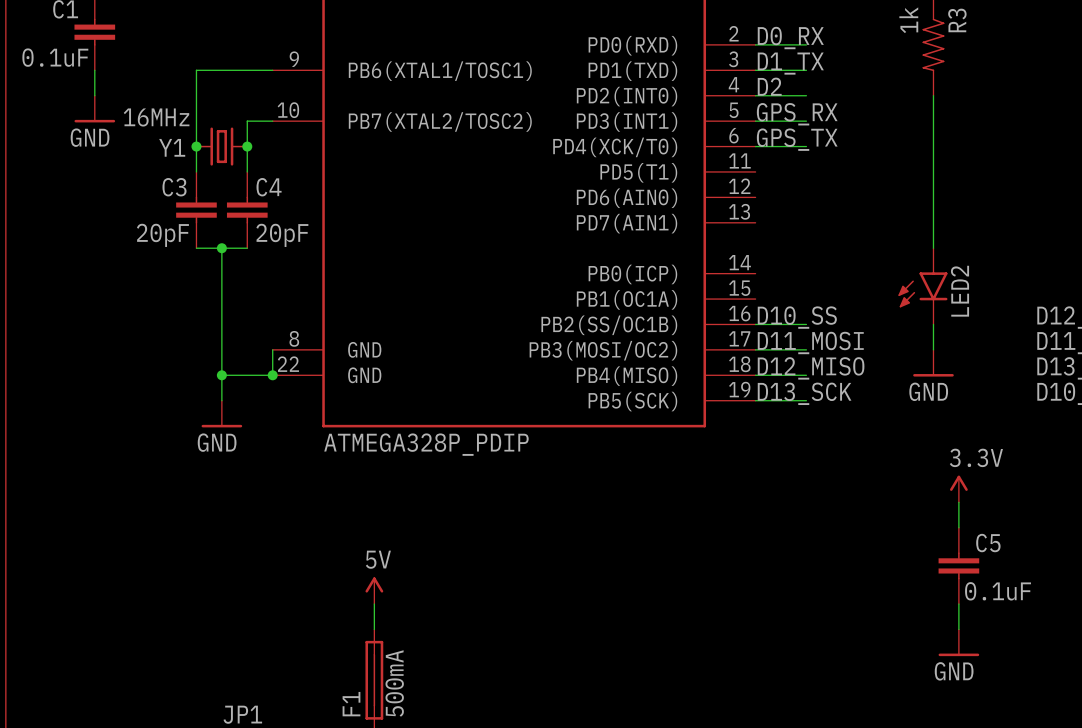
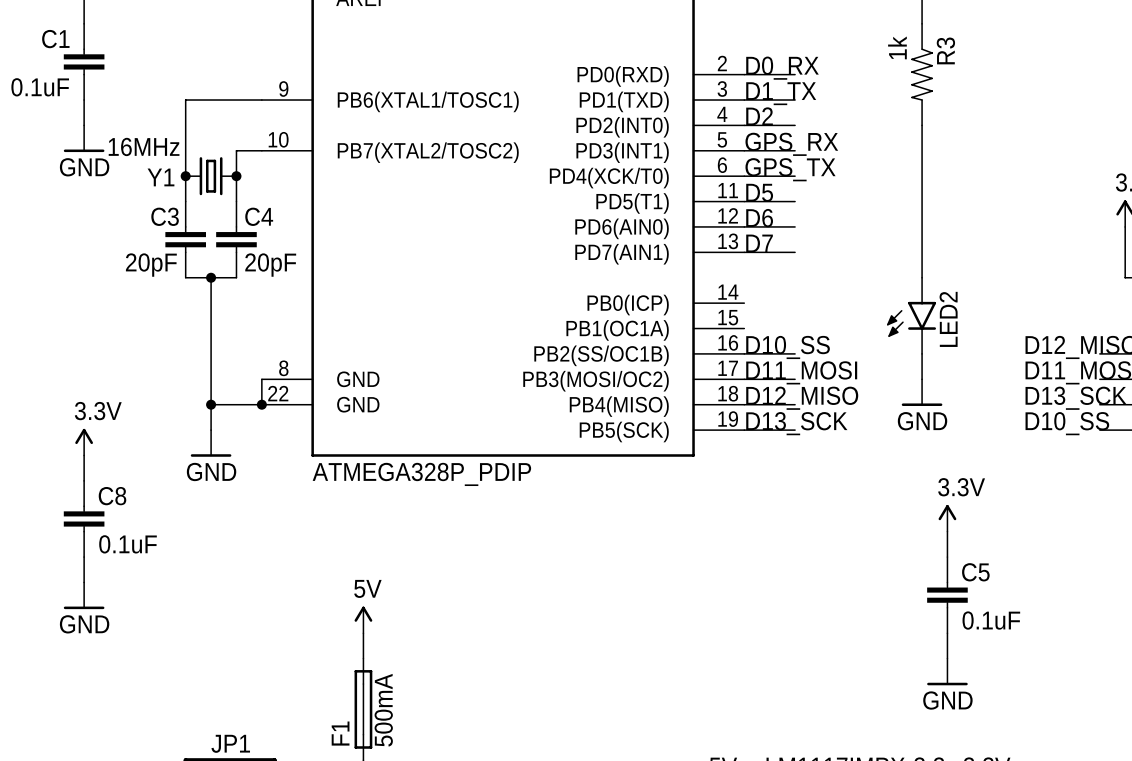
label: none -> D5 (759, 192)
wire: none -> (744, 201) (795, 201)
label: none -> D6 (759, 218)
wire: none -> (744, 226) (795, 226)
label: none -> D7 (759, 243)
wire: none -> (744, 252) (795, 252)
power symbol: none -> 3.3V (84, 442)
wire: none -> (84, 455) (84, 480)
C8: none -> 0.1uF (84, 518)
wire: none -> (84, 557) (84, 582)
power symbol: none -> GND (84, 595)

